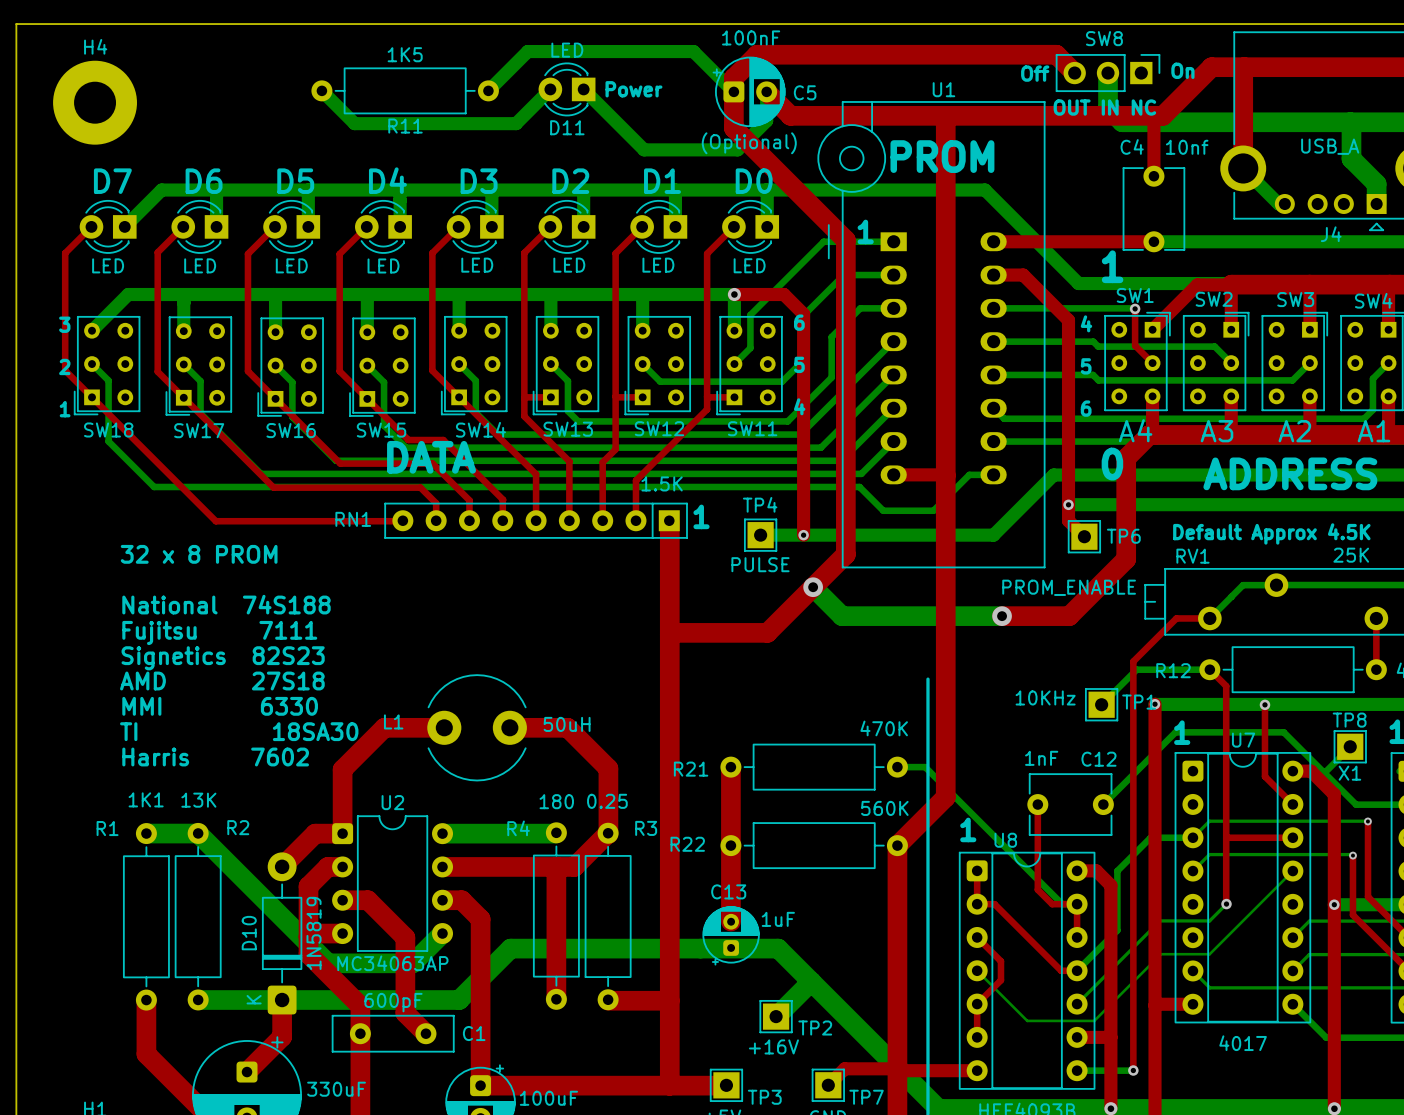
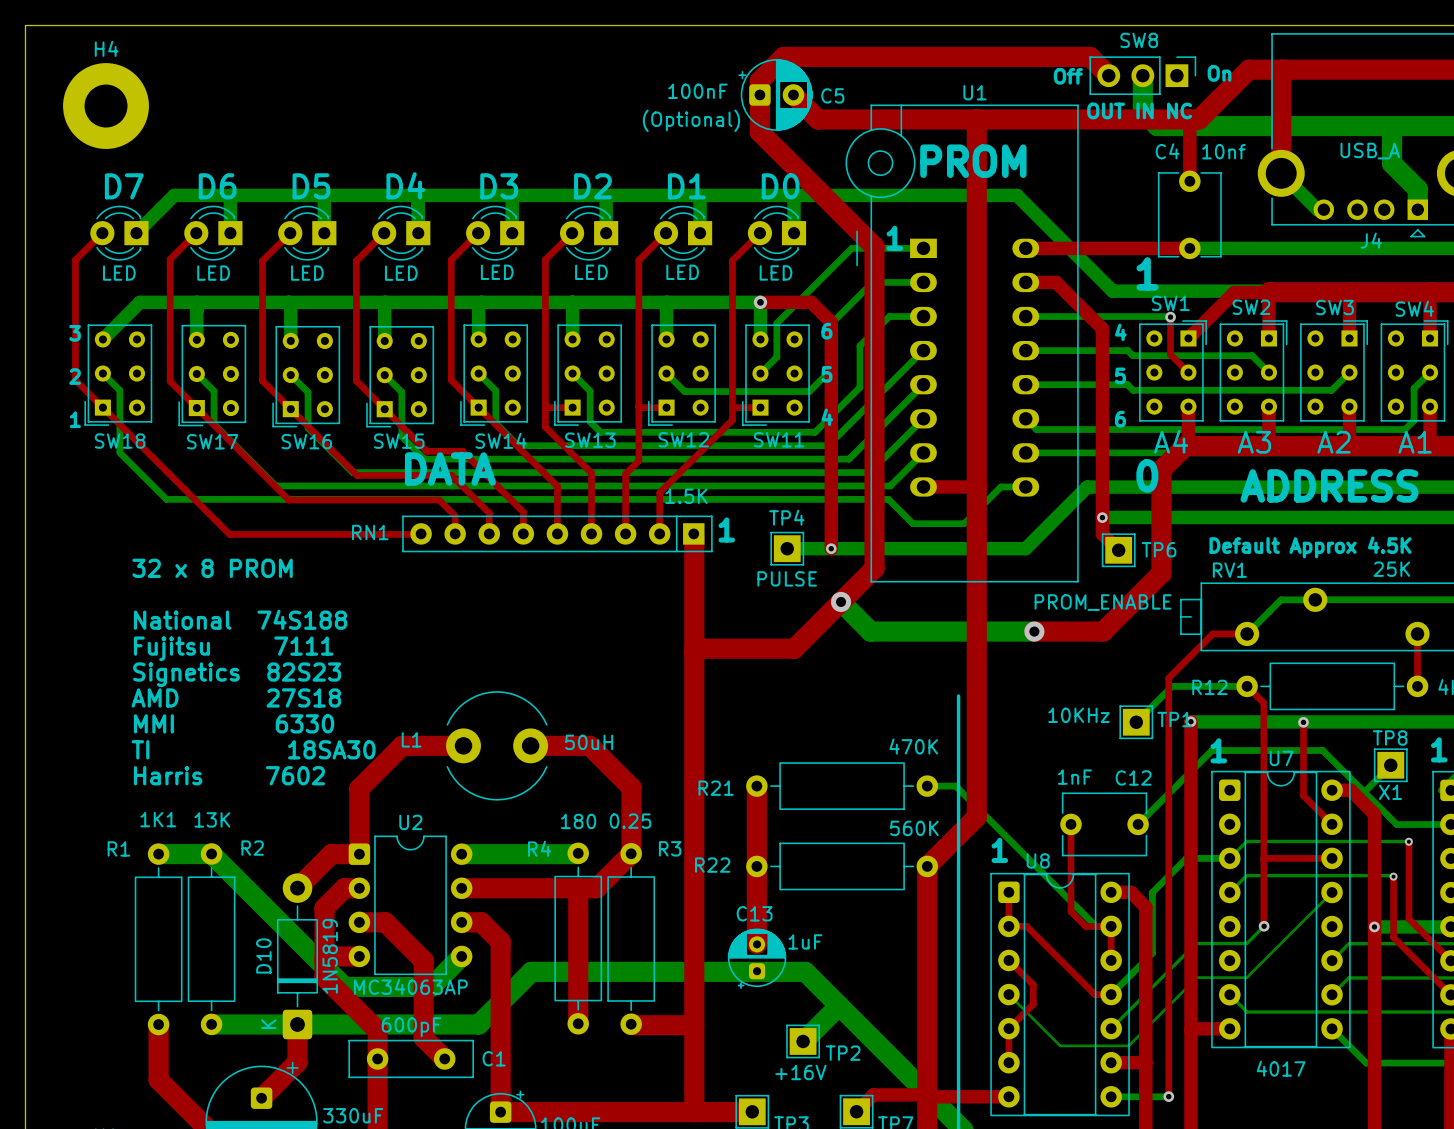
C5 value position: 100nF (751, 37) -> 100nF (697, 91)
bottom track: (550, 89) (516, 123) (354, 123) (321, 90) -> none
D11: LED (567, 89) -> none
bottom track: (583, 89) (644, 149) (737, 149) (766, 120) (766, 91) -> none
text: Power (633, 89) -> none
R11: 1K5 (405, 90) -> none
bottom track: (488, 90) (527, 51) (693, 51) (733, 91) -> none
text position: (Optional) (749, 143) -> (Optional) (691, 120)

